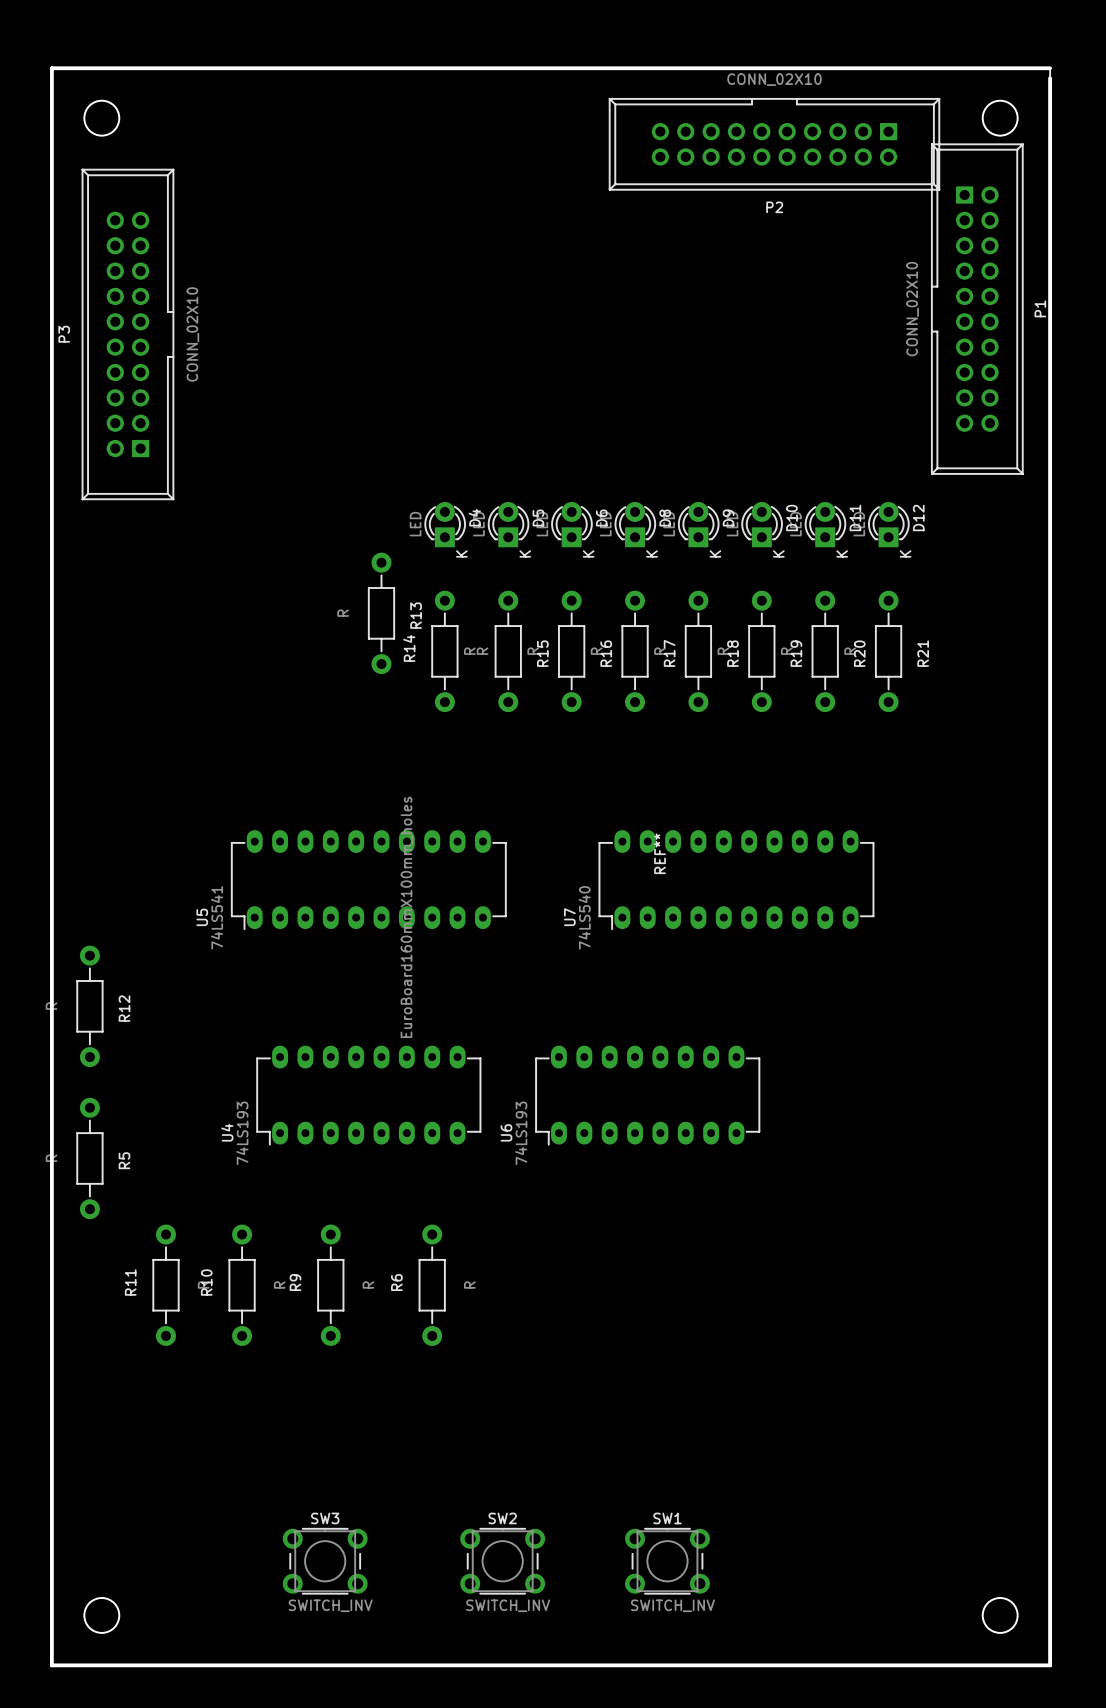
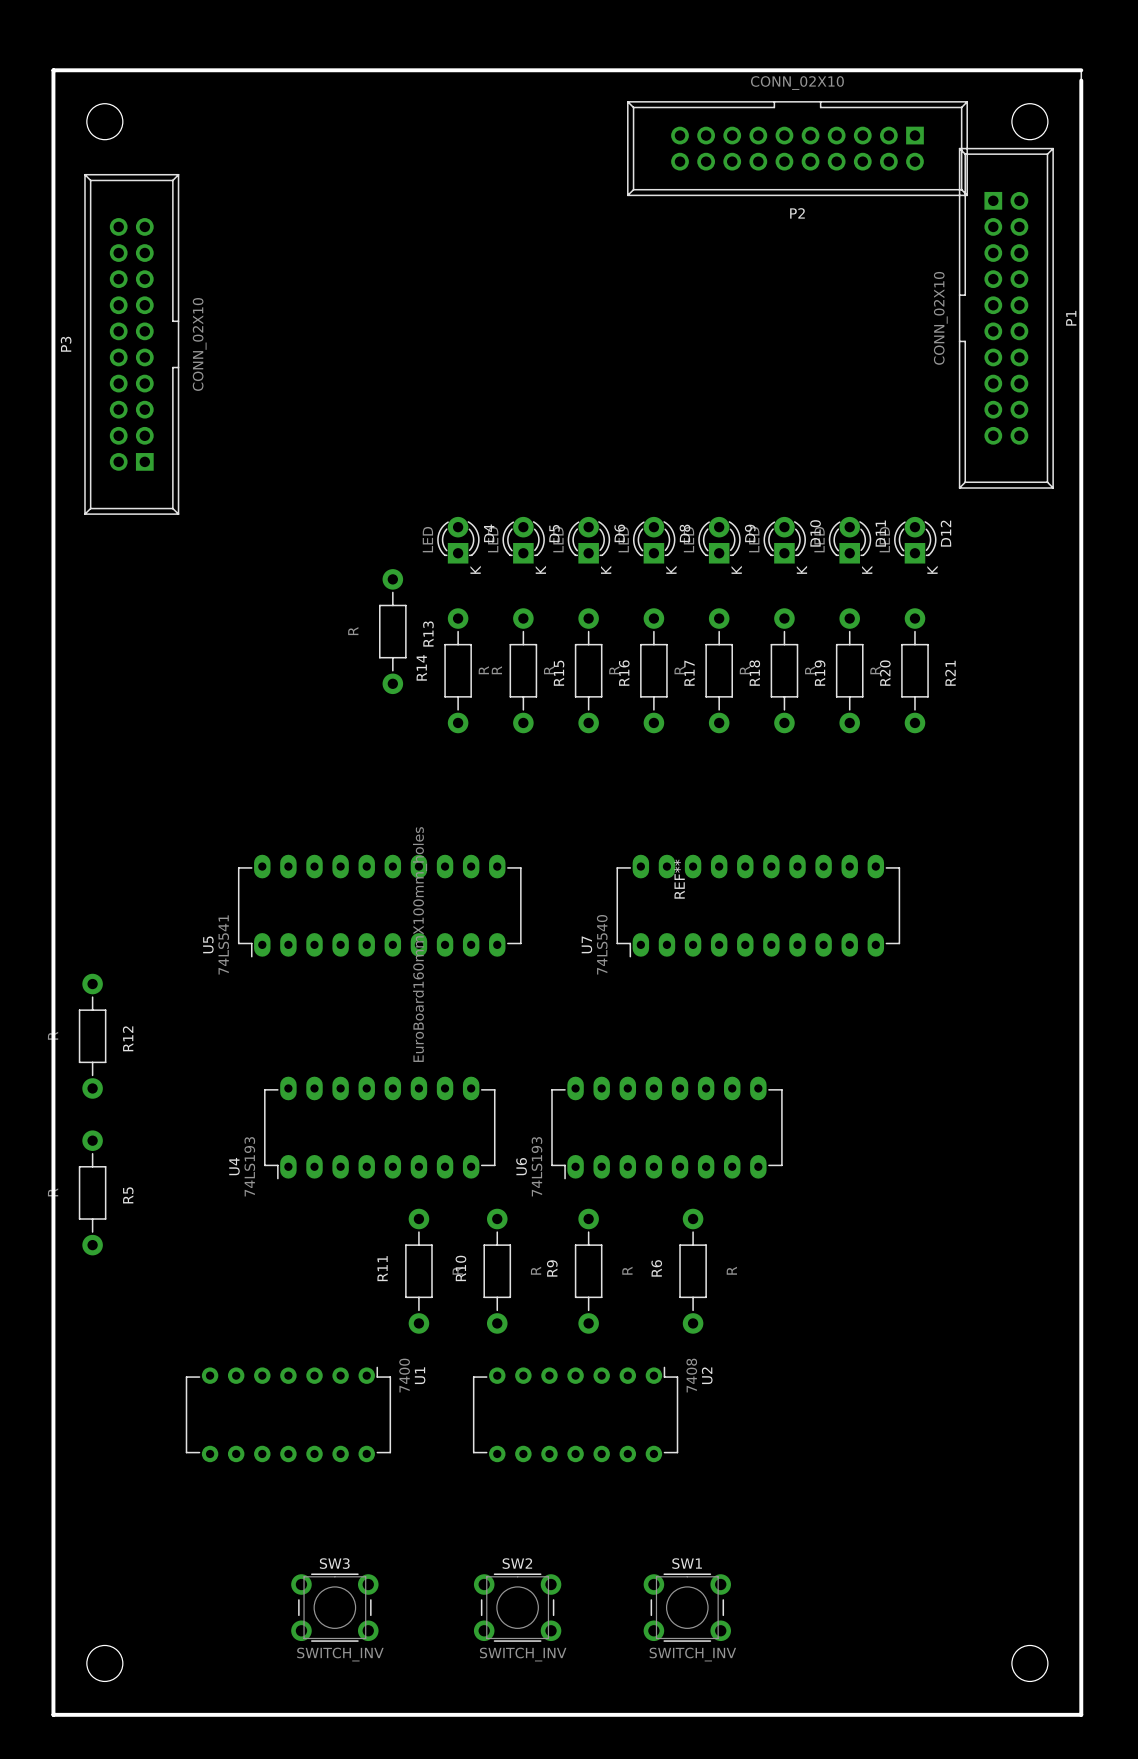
R11 position: (165, 1285) -> (418, 1271)
R10 position: (242, 1285) -> (497, 1271)
R9 position: (330, 1285) -> (588, 1271)
R6 position: (432, 1285) -> (693, 1271)
U1: none -> 7400 (288, 1414)
U2: none -> 7408 (575, 1414)

